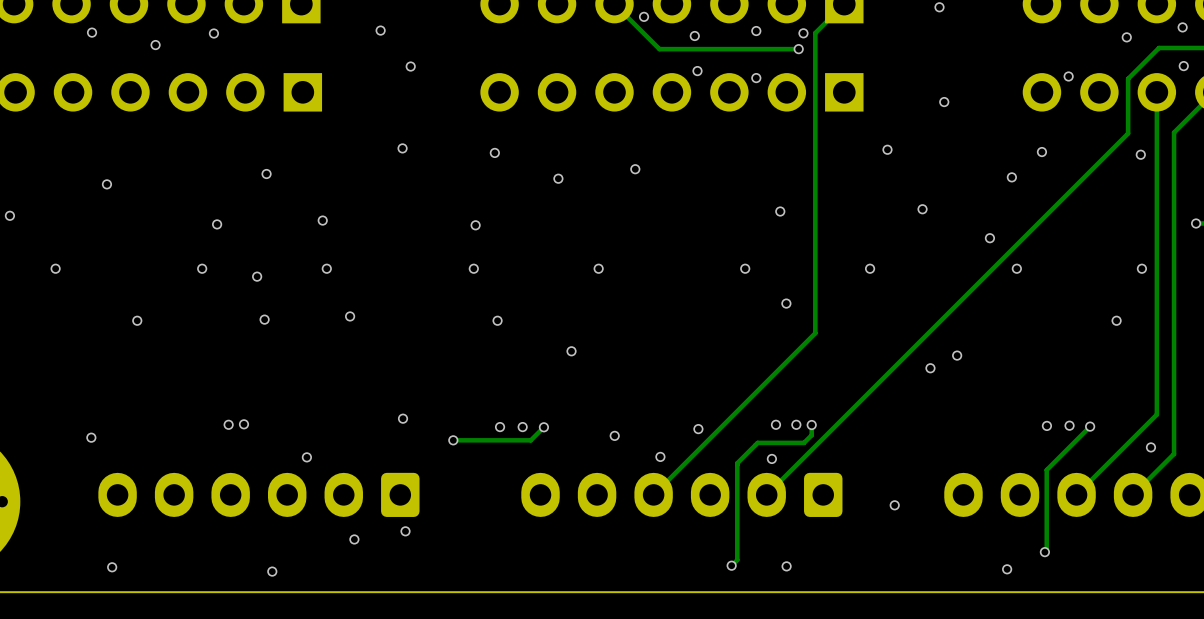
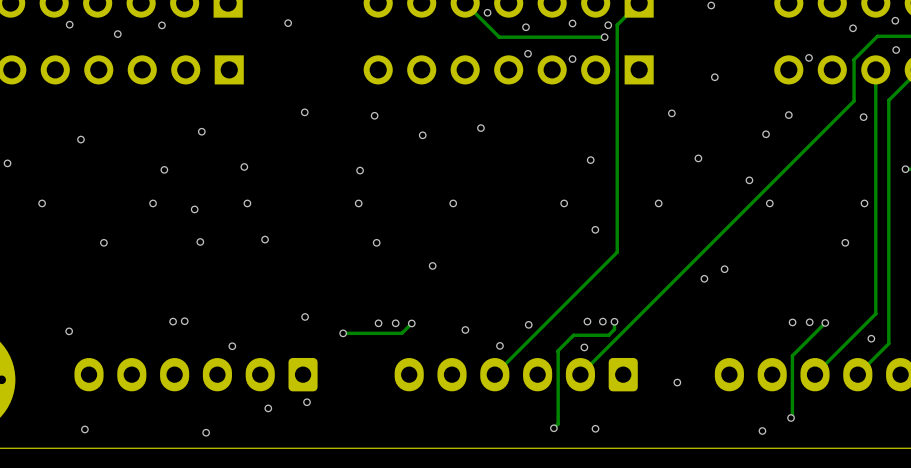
via: (410, 66) -> none

